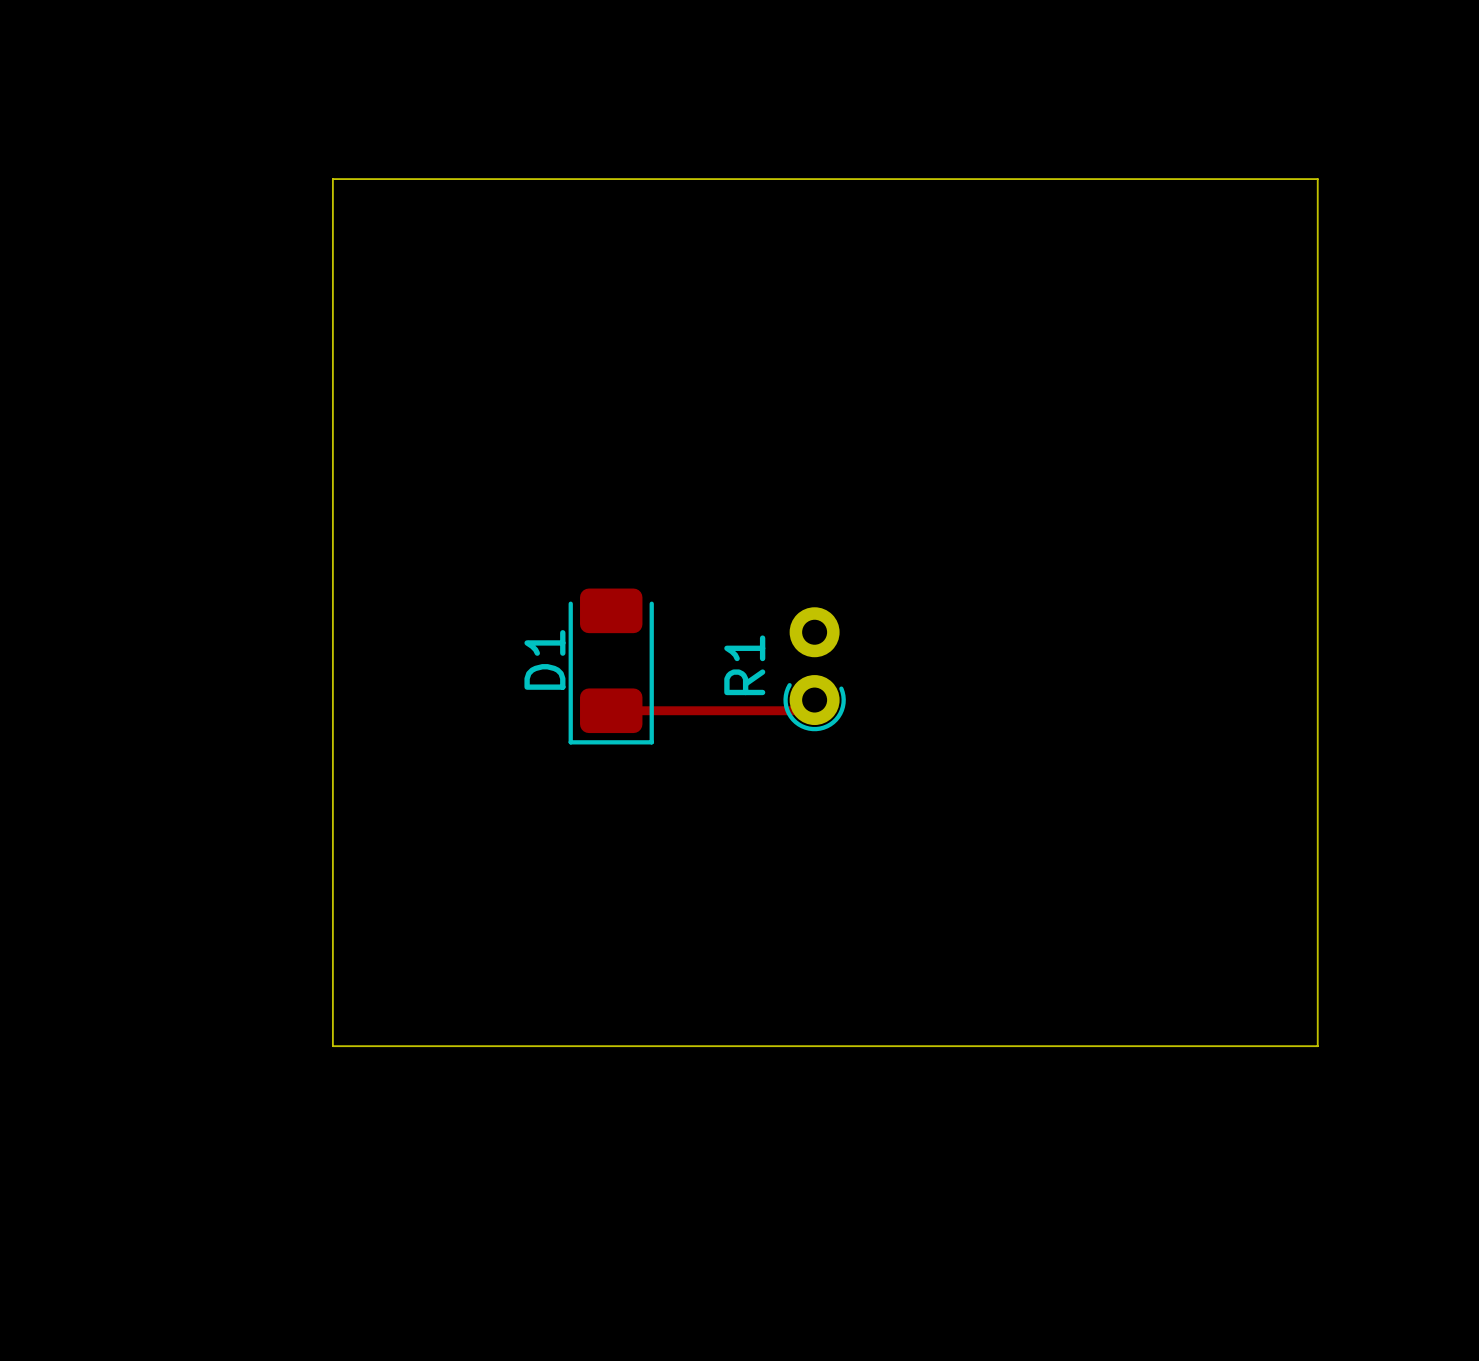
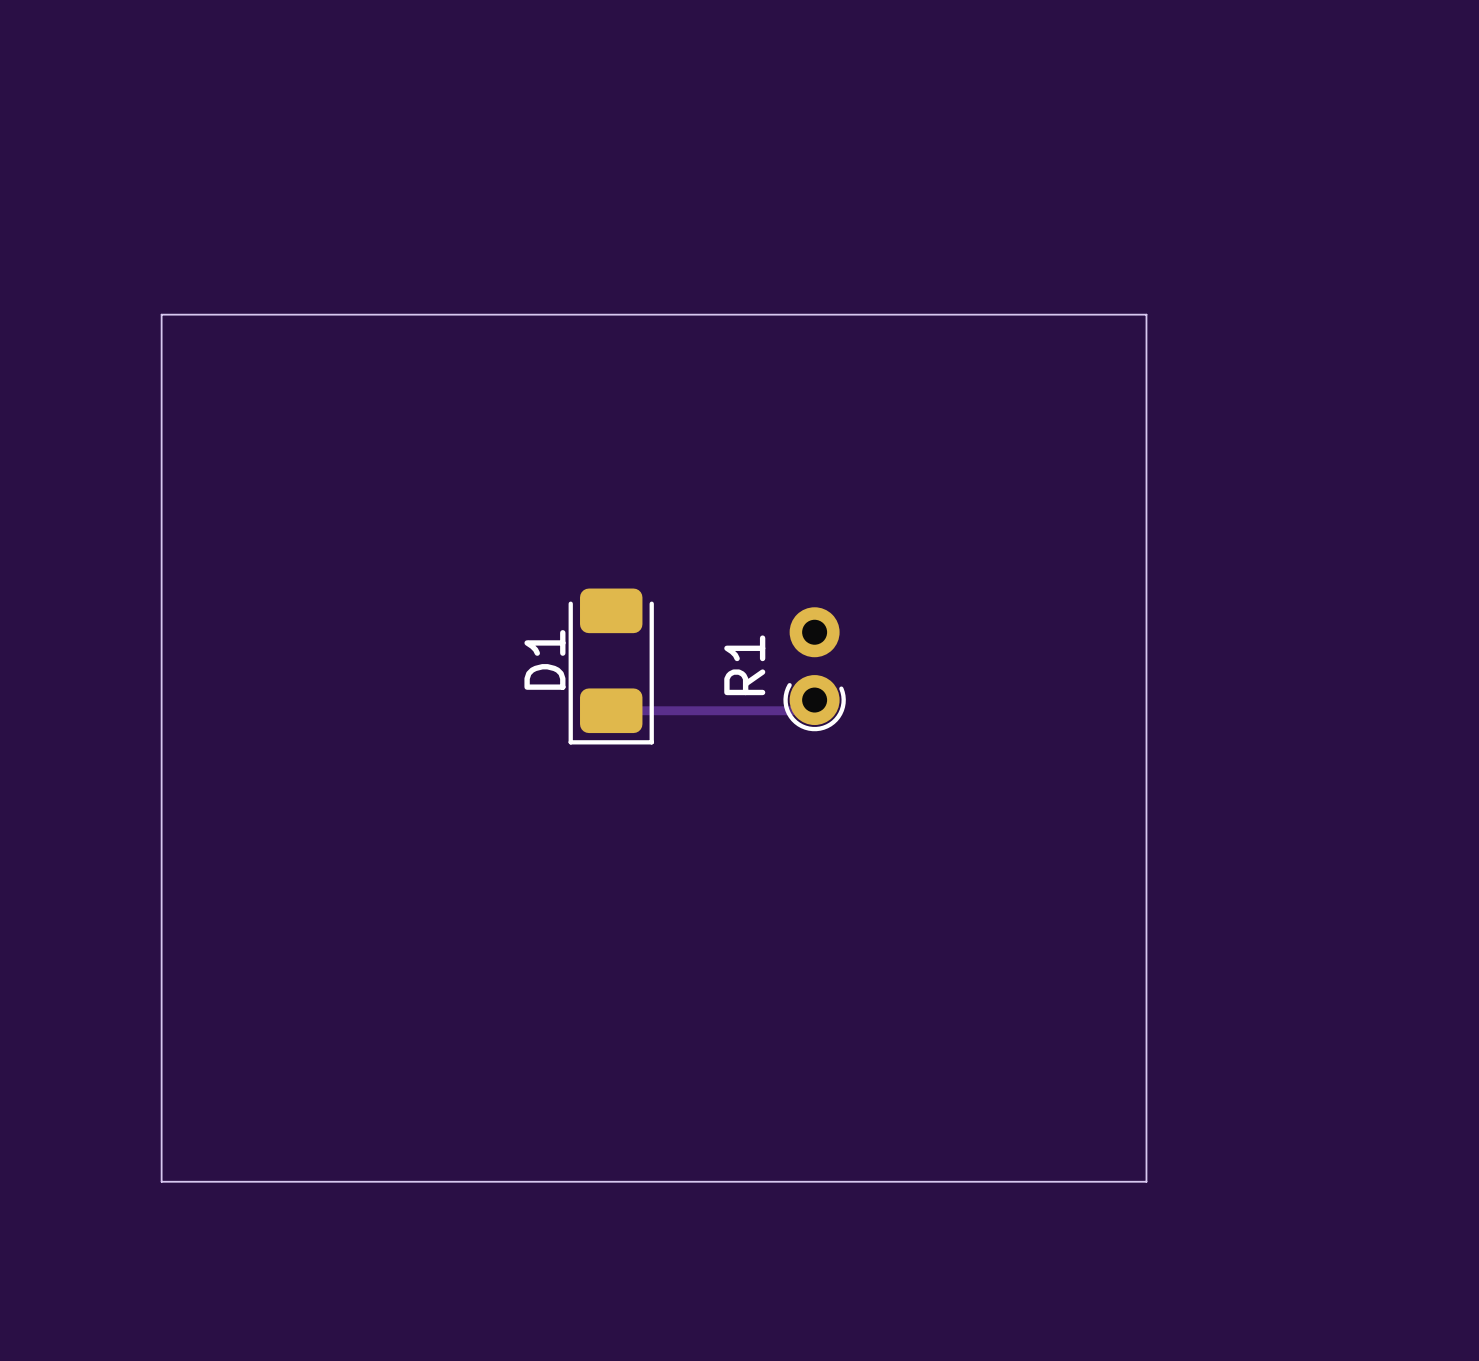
board edge: (332, 179) (332, 1046) (1317, 1046) (1317, 179) (332, 179) -> (161, 314) (161, 1181) (1146, 1181) (1146, 314) (161, 314)

